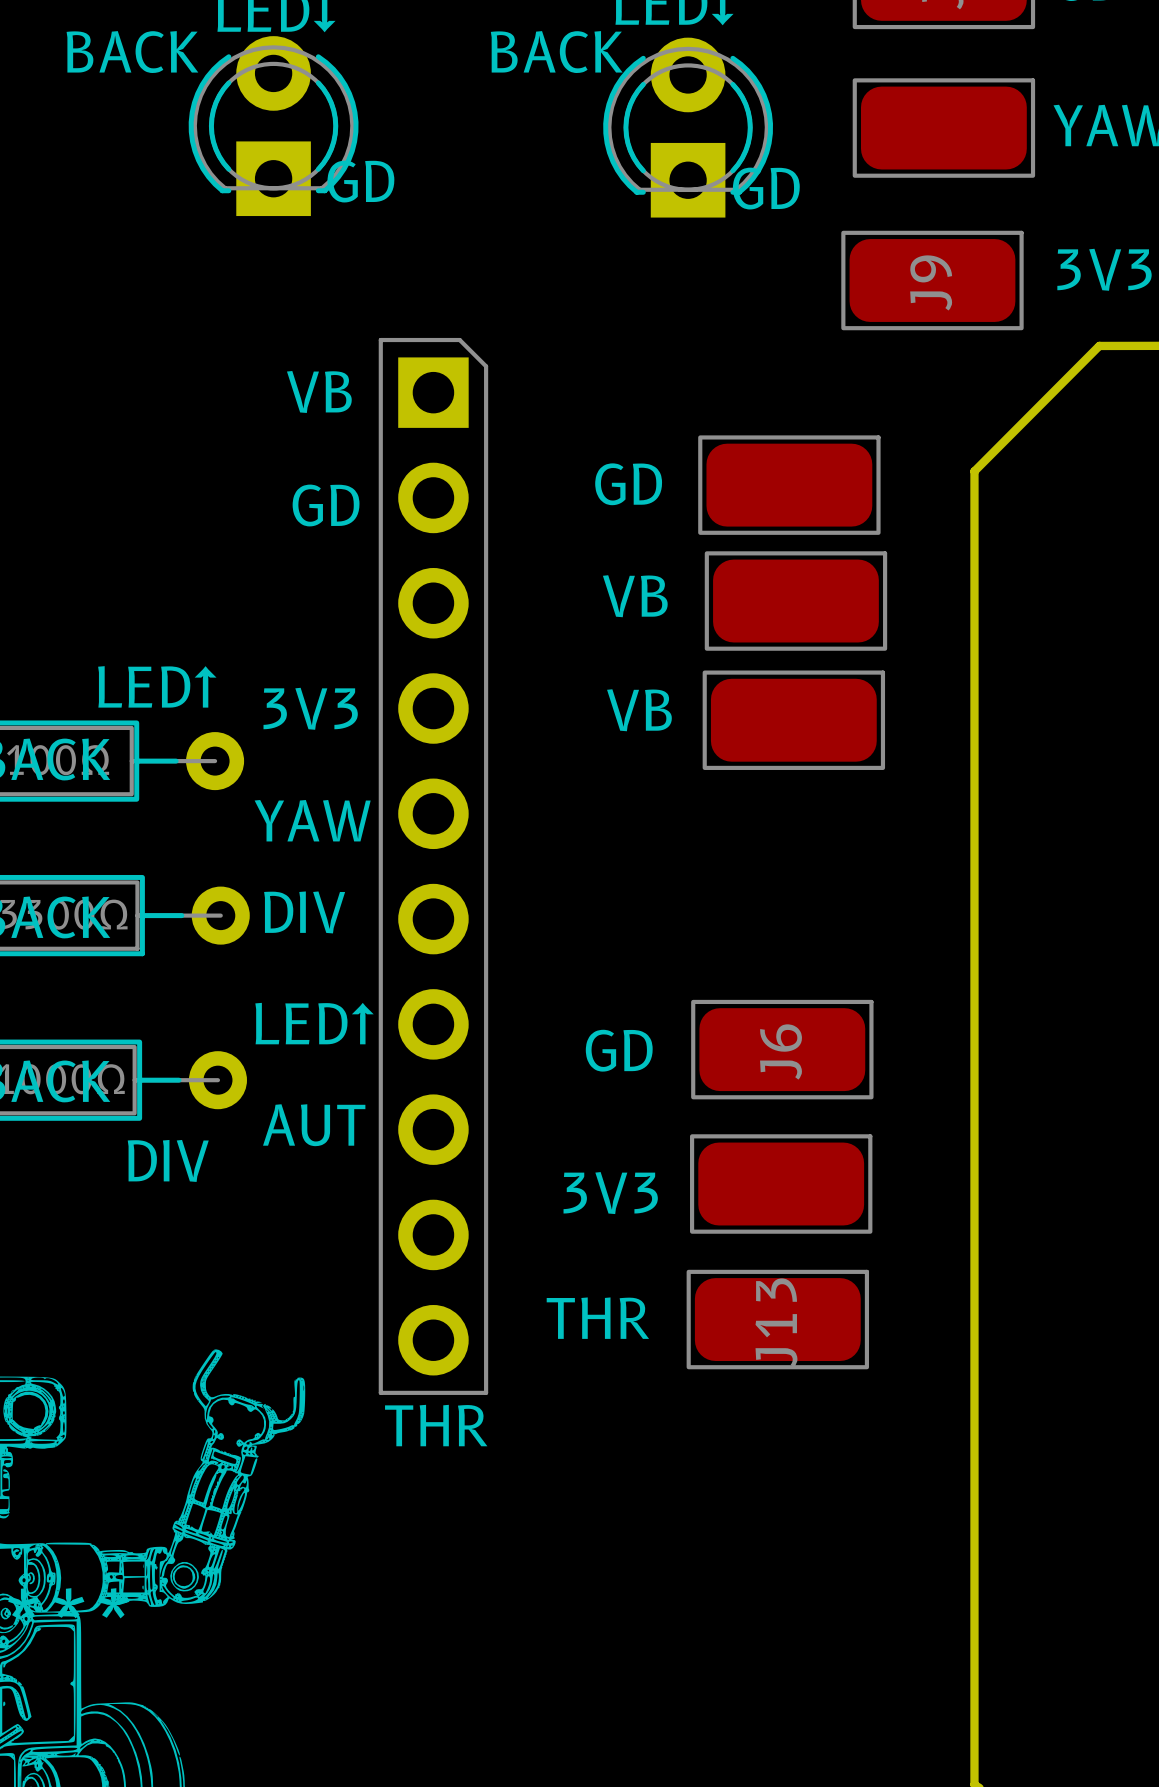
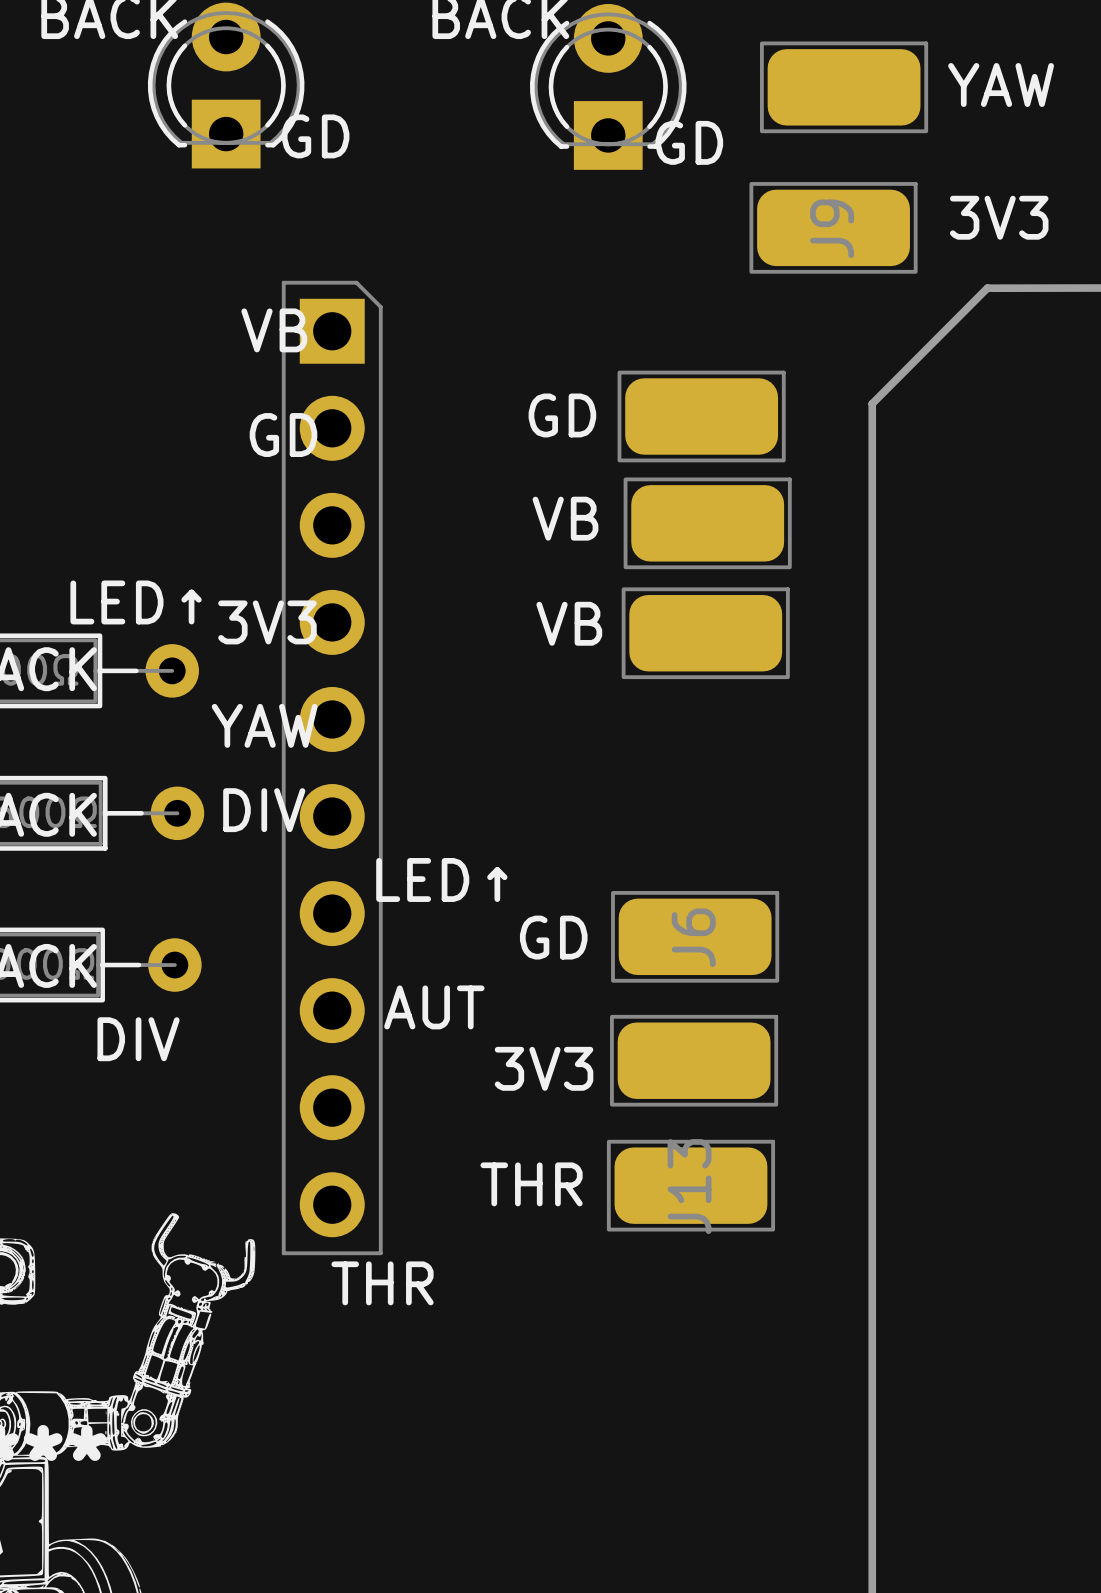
part position: (433, 866) -> (332, 767)
text position: LED↑ (314, 1023) -> LED↑ (441, 879)
text position: AUT (314, 1125) -> AUT (434, 1007)

